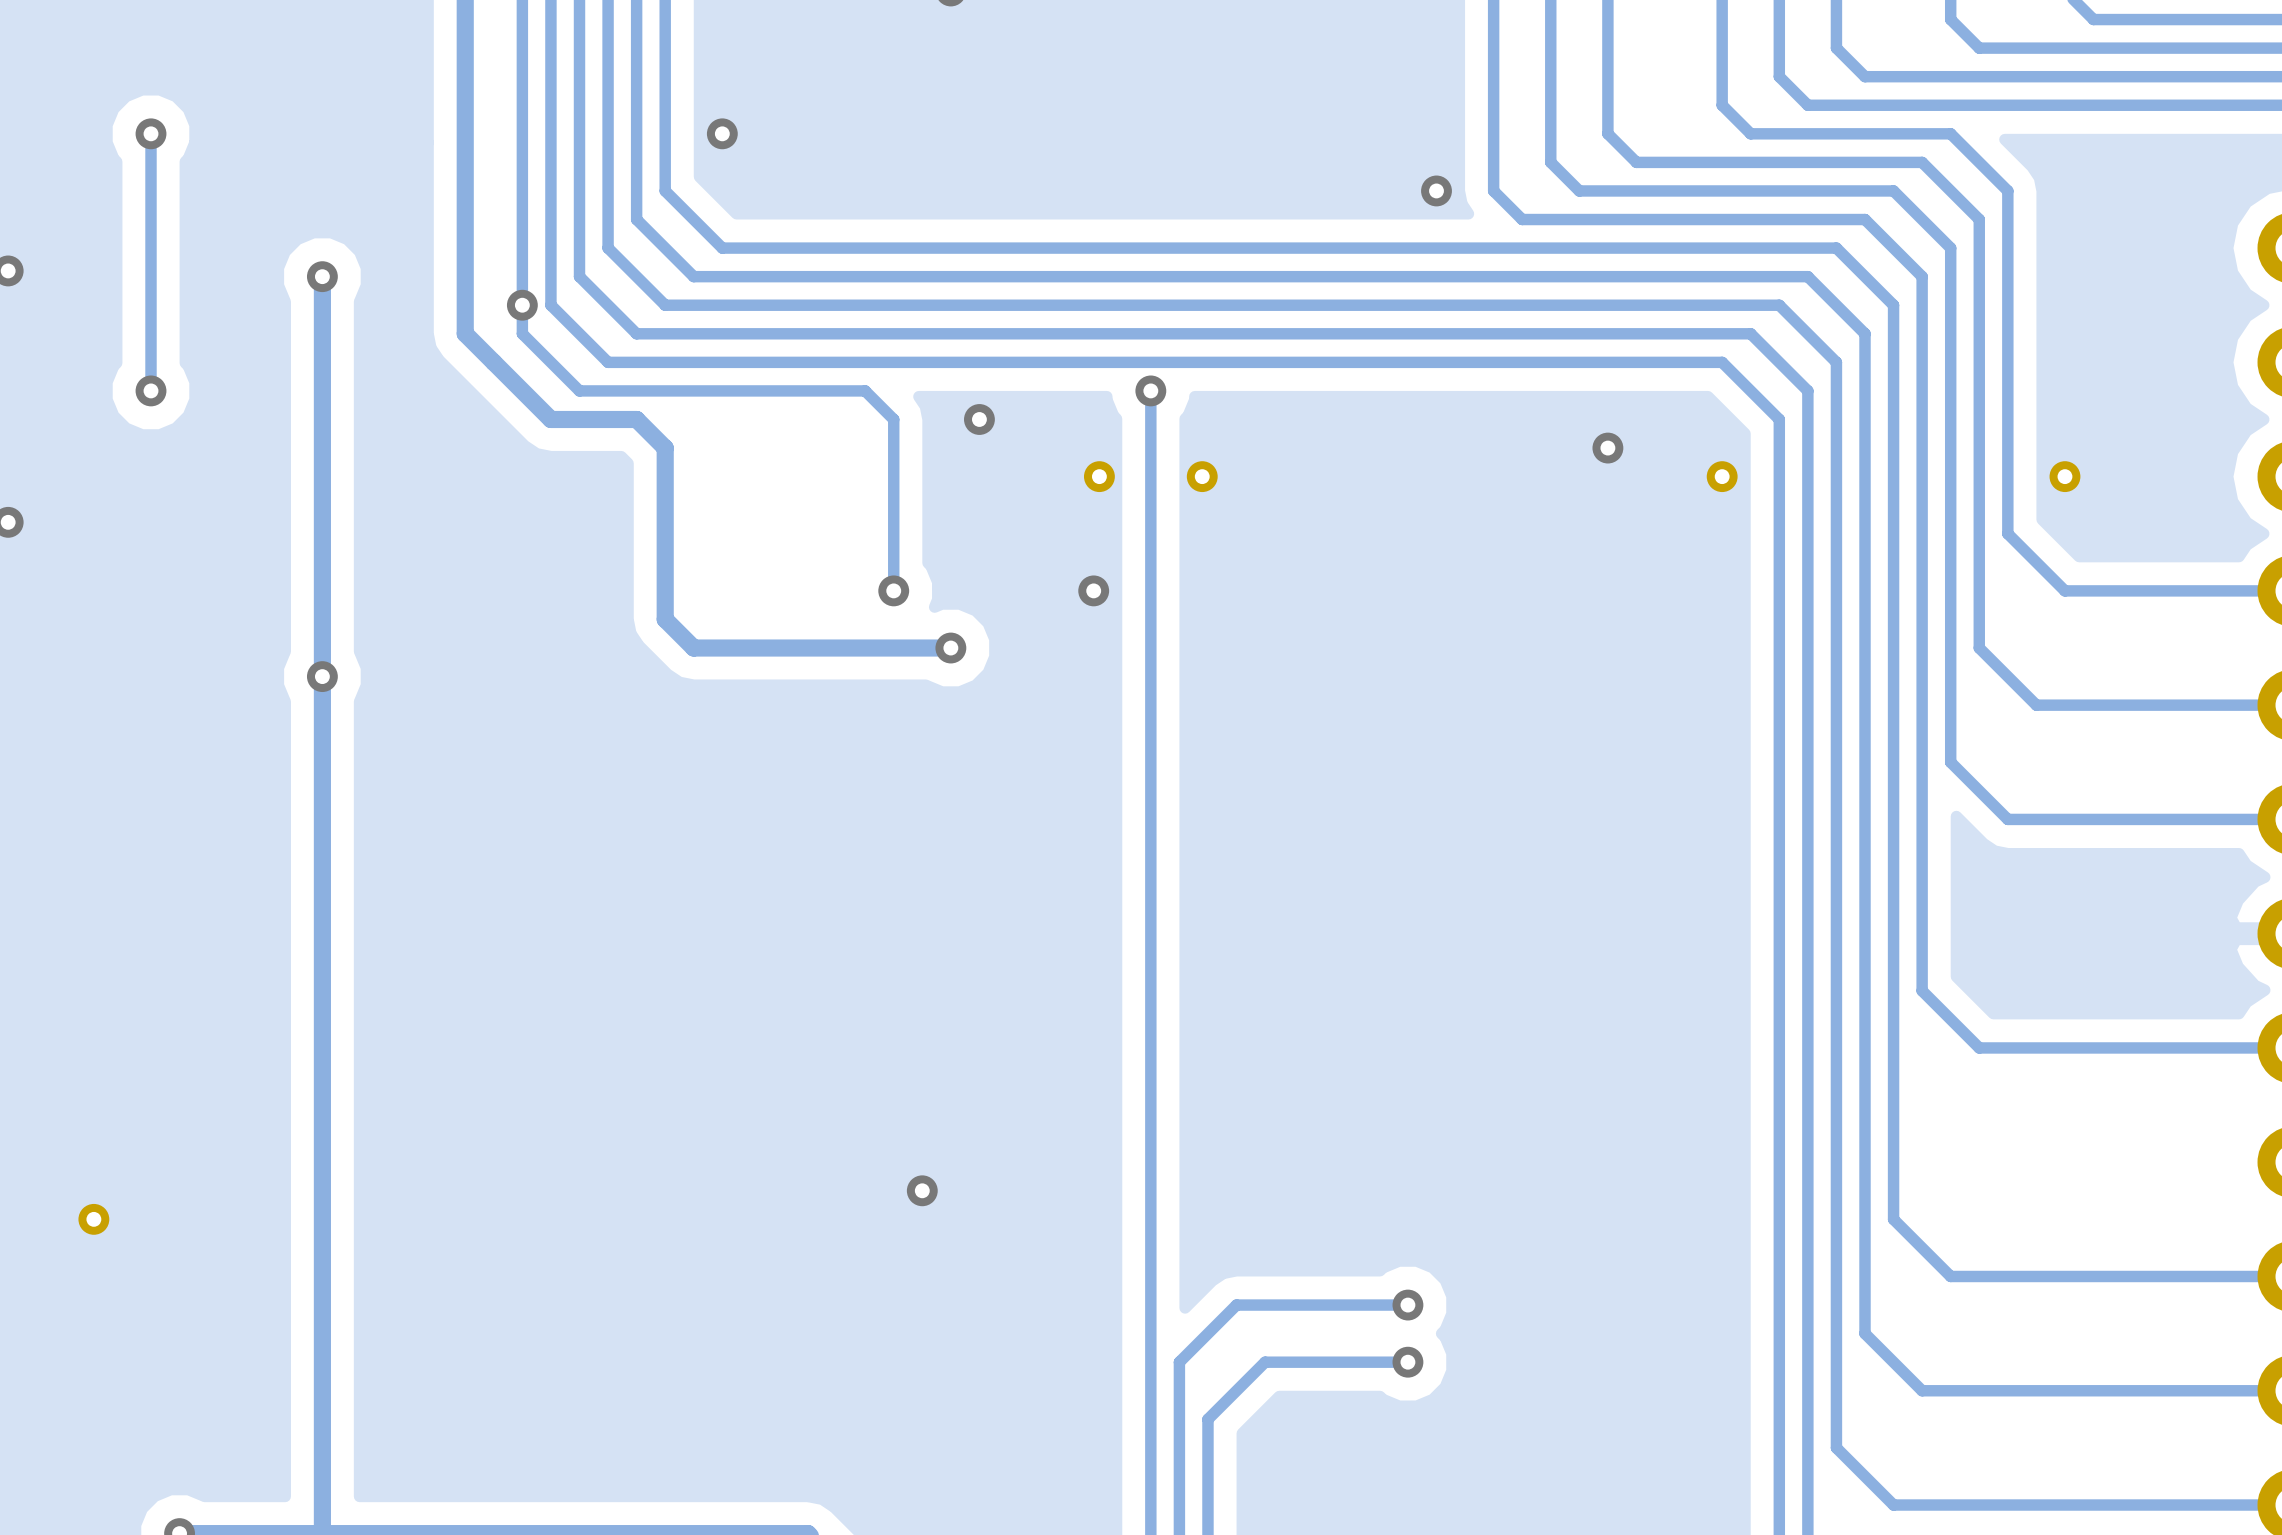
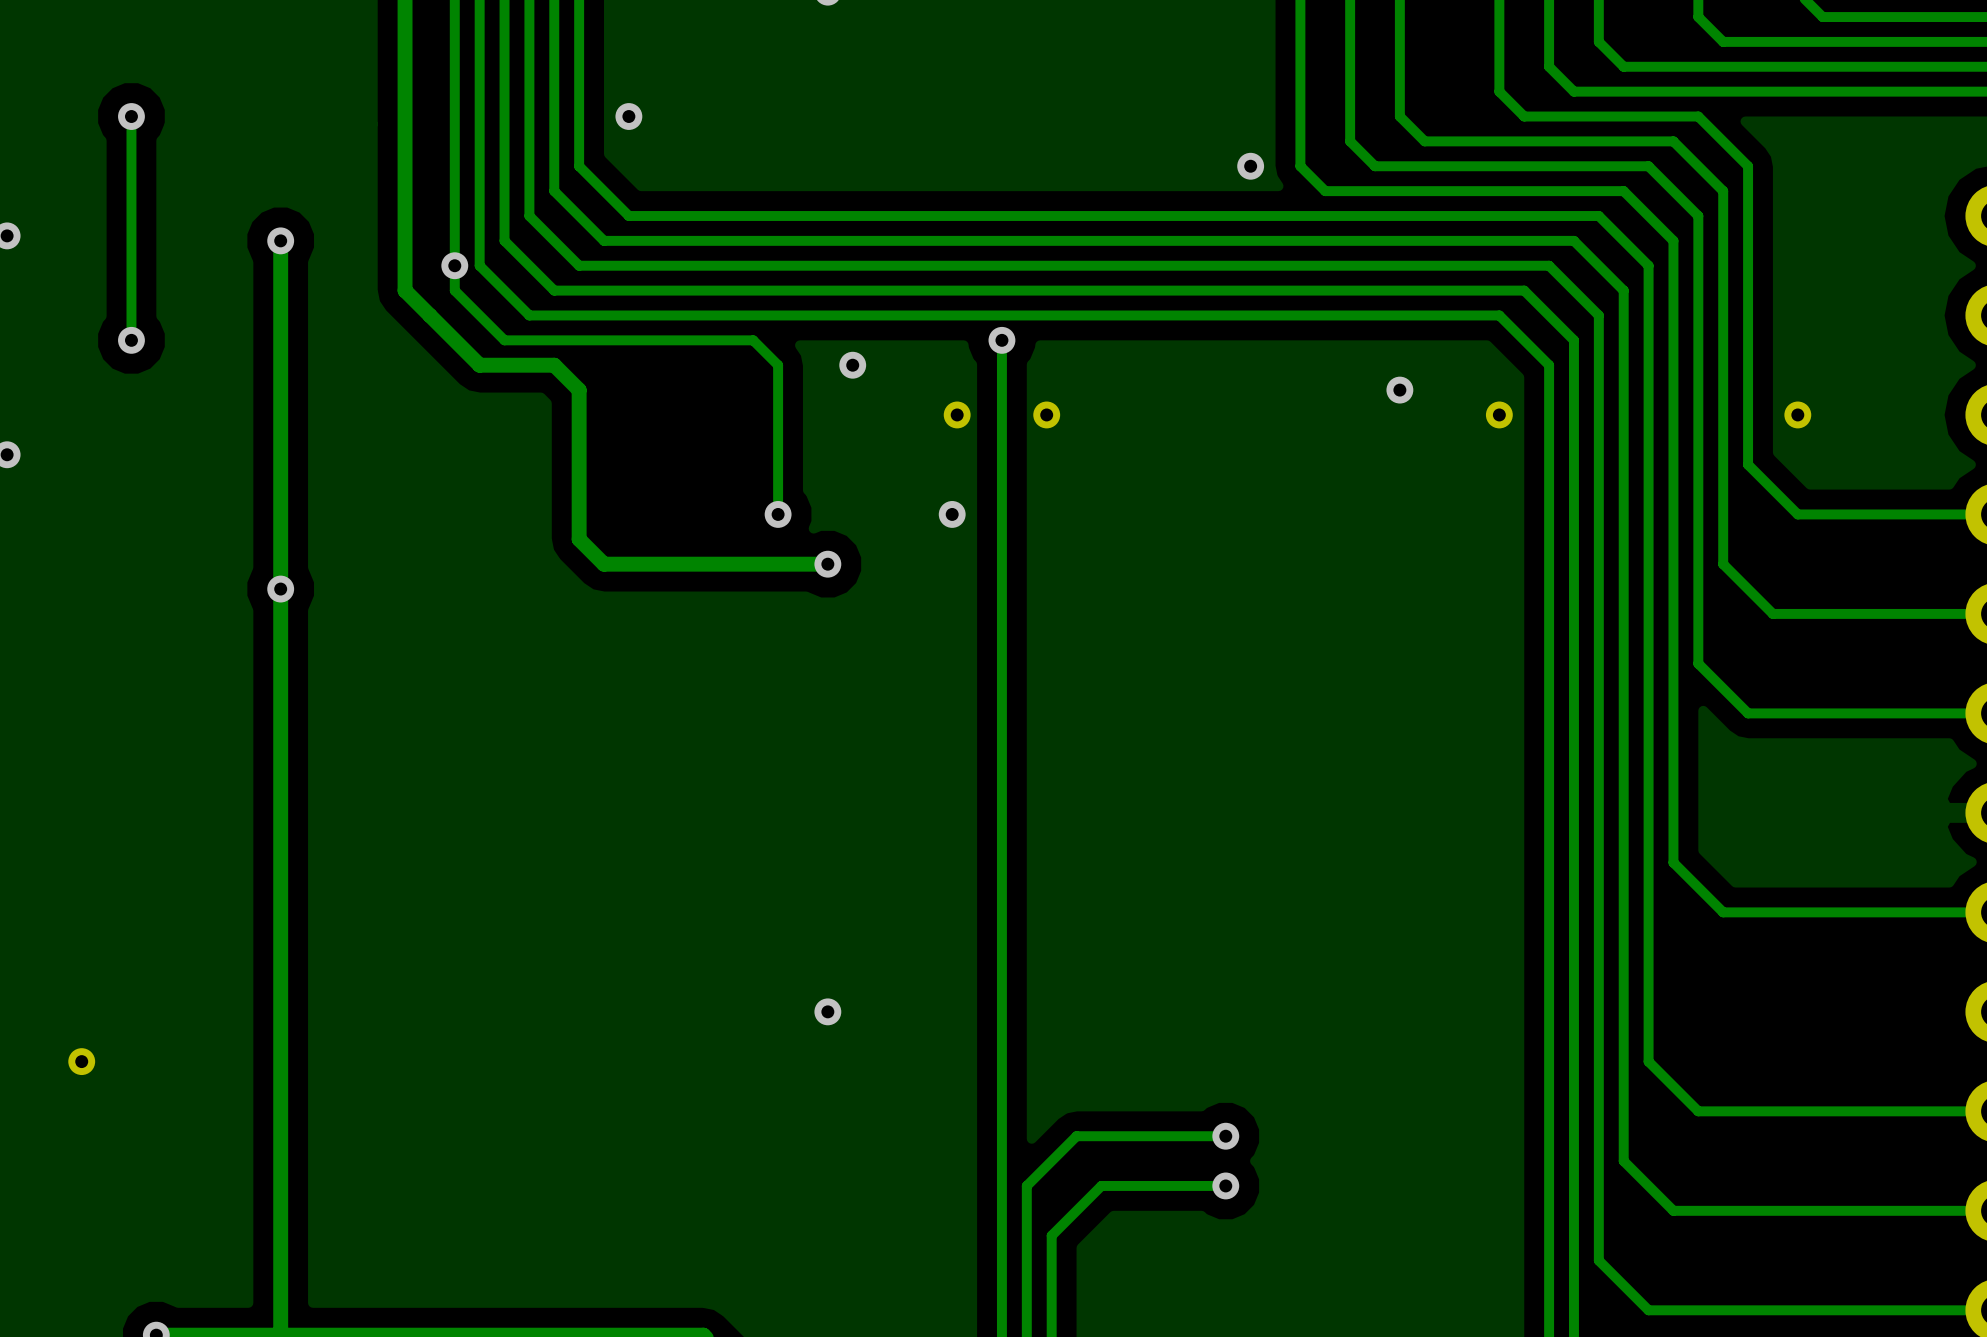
via position: (922, 1190) -> (827, 1011)

